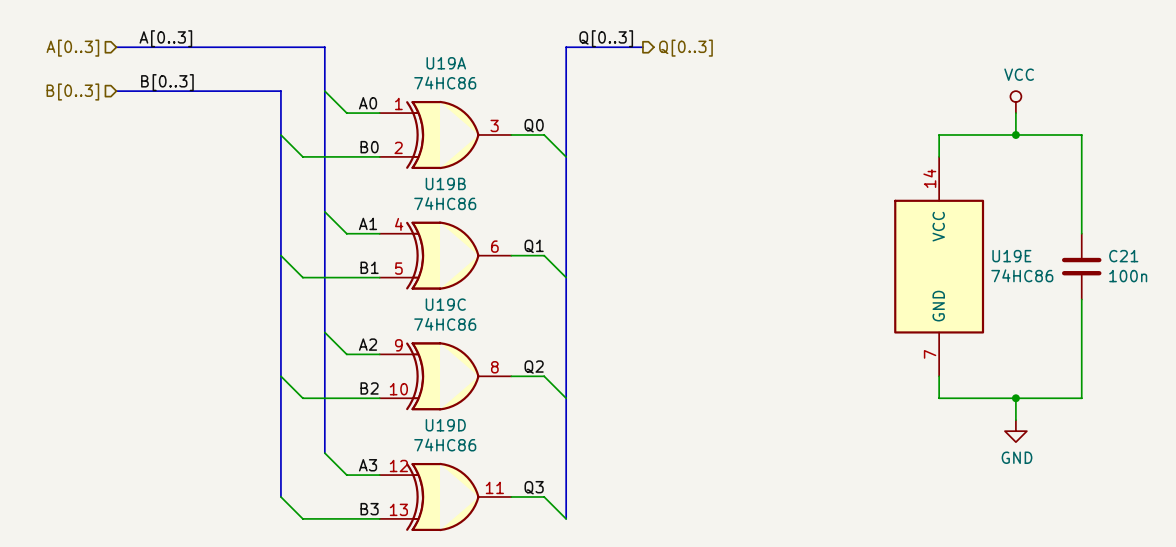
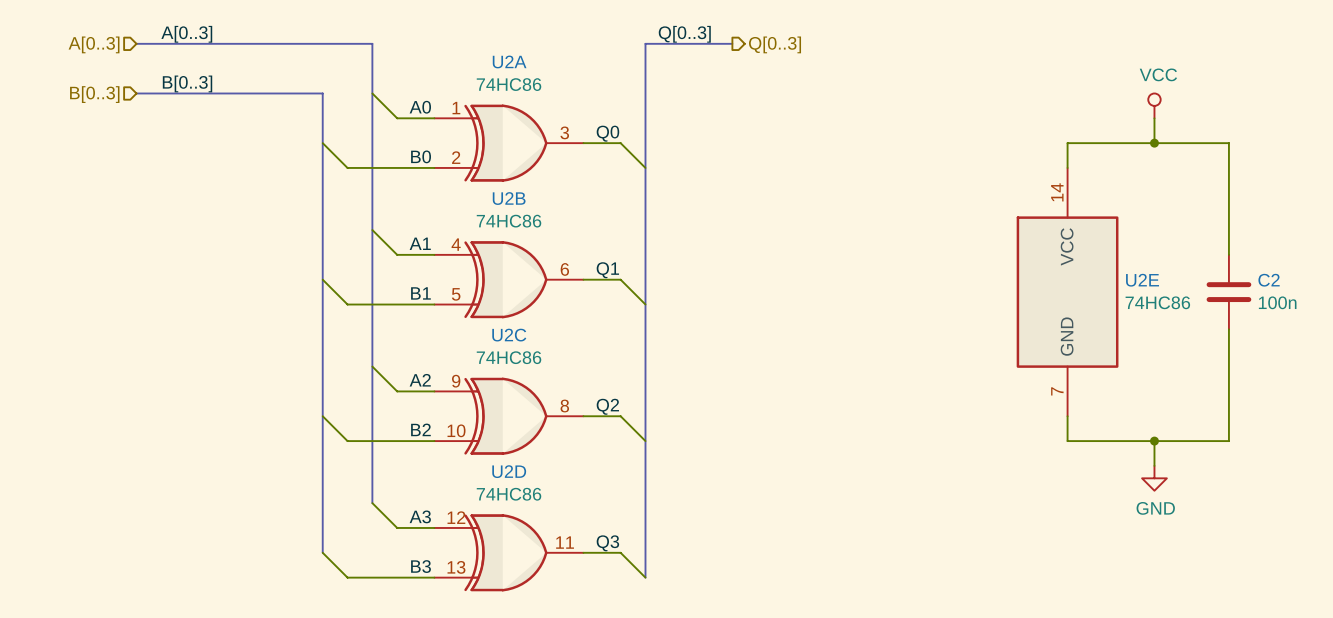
U19A name: U19A (446, 63) -> U2A (509, 61)
U19B name: U19B (445, 183) -> U2B (509, 198)
U19E name: U19E (1011, 256) -> U2E (1142, 280)
C21 name: C21 (1123, 256) -> C2 (1269, 280)
U19C name: U19C (445, 304) -> U2C (509, 335)
U19D name: U19D (445, 425) -> U2D (509, 471)

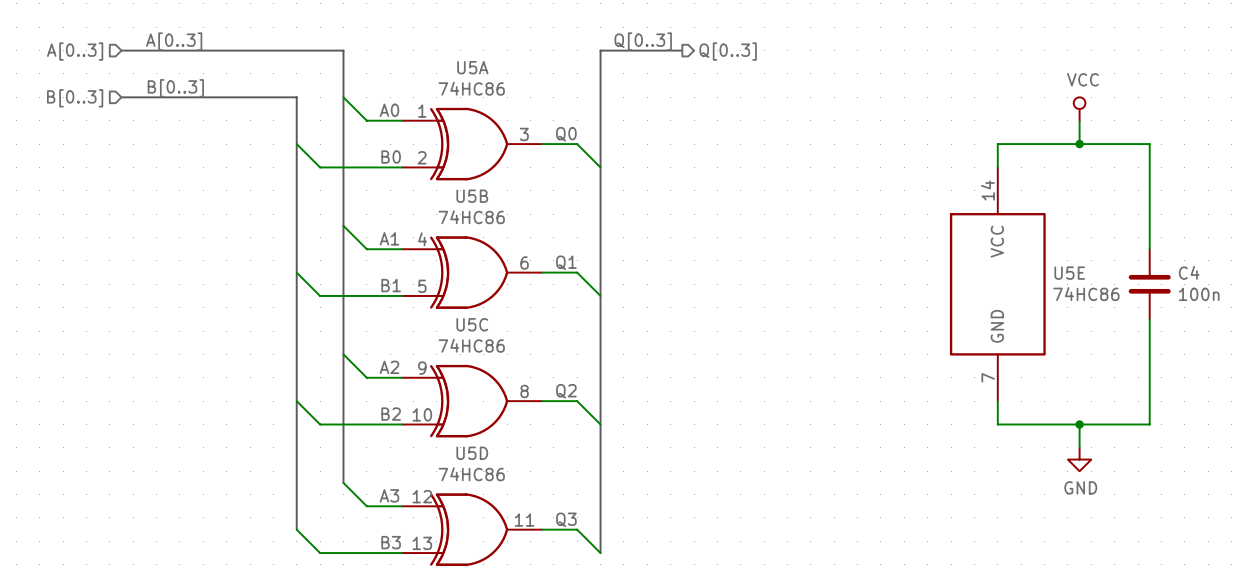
U2A name: U2A (509, 61) -> U5A (472, 67)
U2B name: U2B (509, 198) -> U5B (472, 196)
U2E name: U2E (1142, 280) -> U5E (1069, 273)
C2 name: C2 (1269, 280) -> C4 (1189, 272)
U2C name: U2C (509, 335) -> U5C (472, 324)
U2D name: U2D (509, 471) -> U5D (472, 453)

